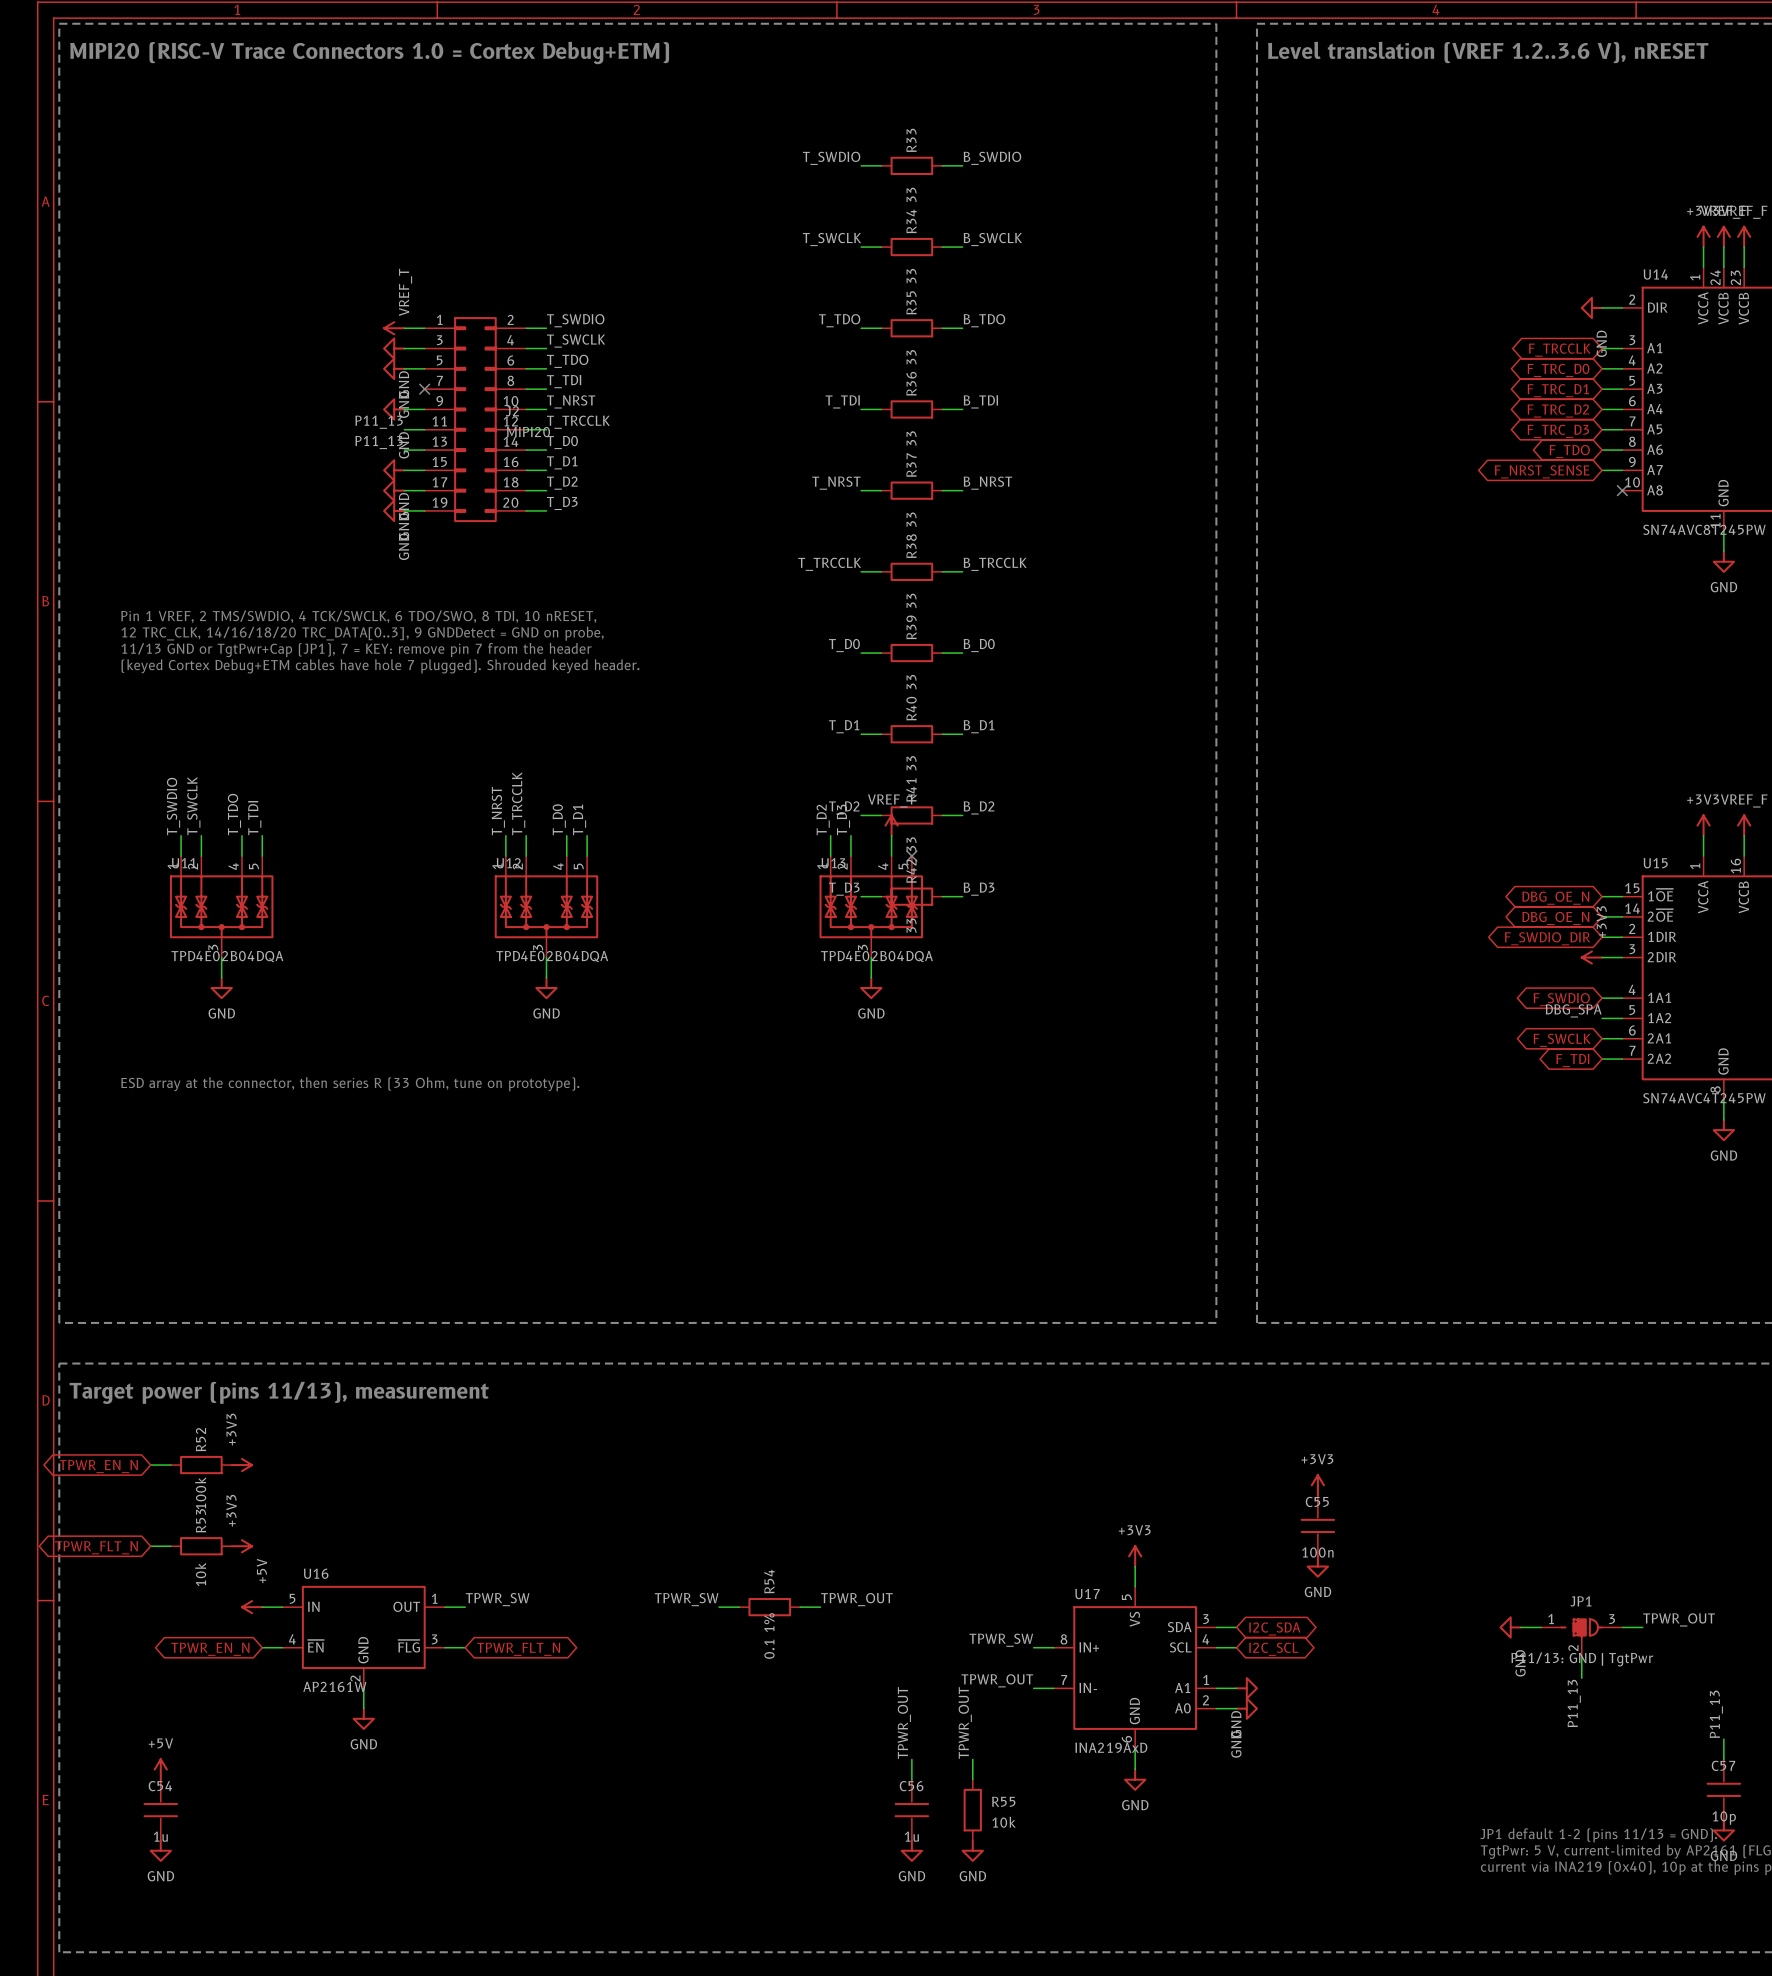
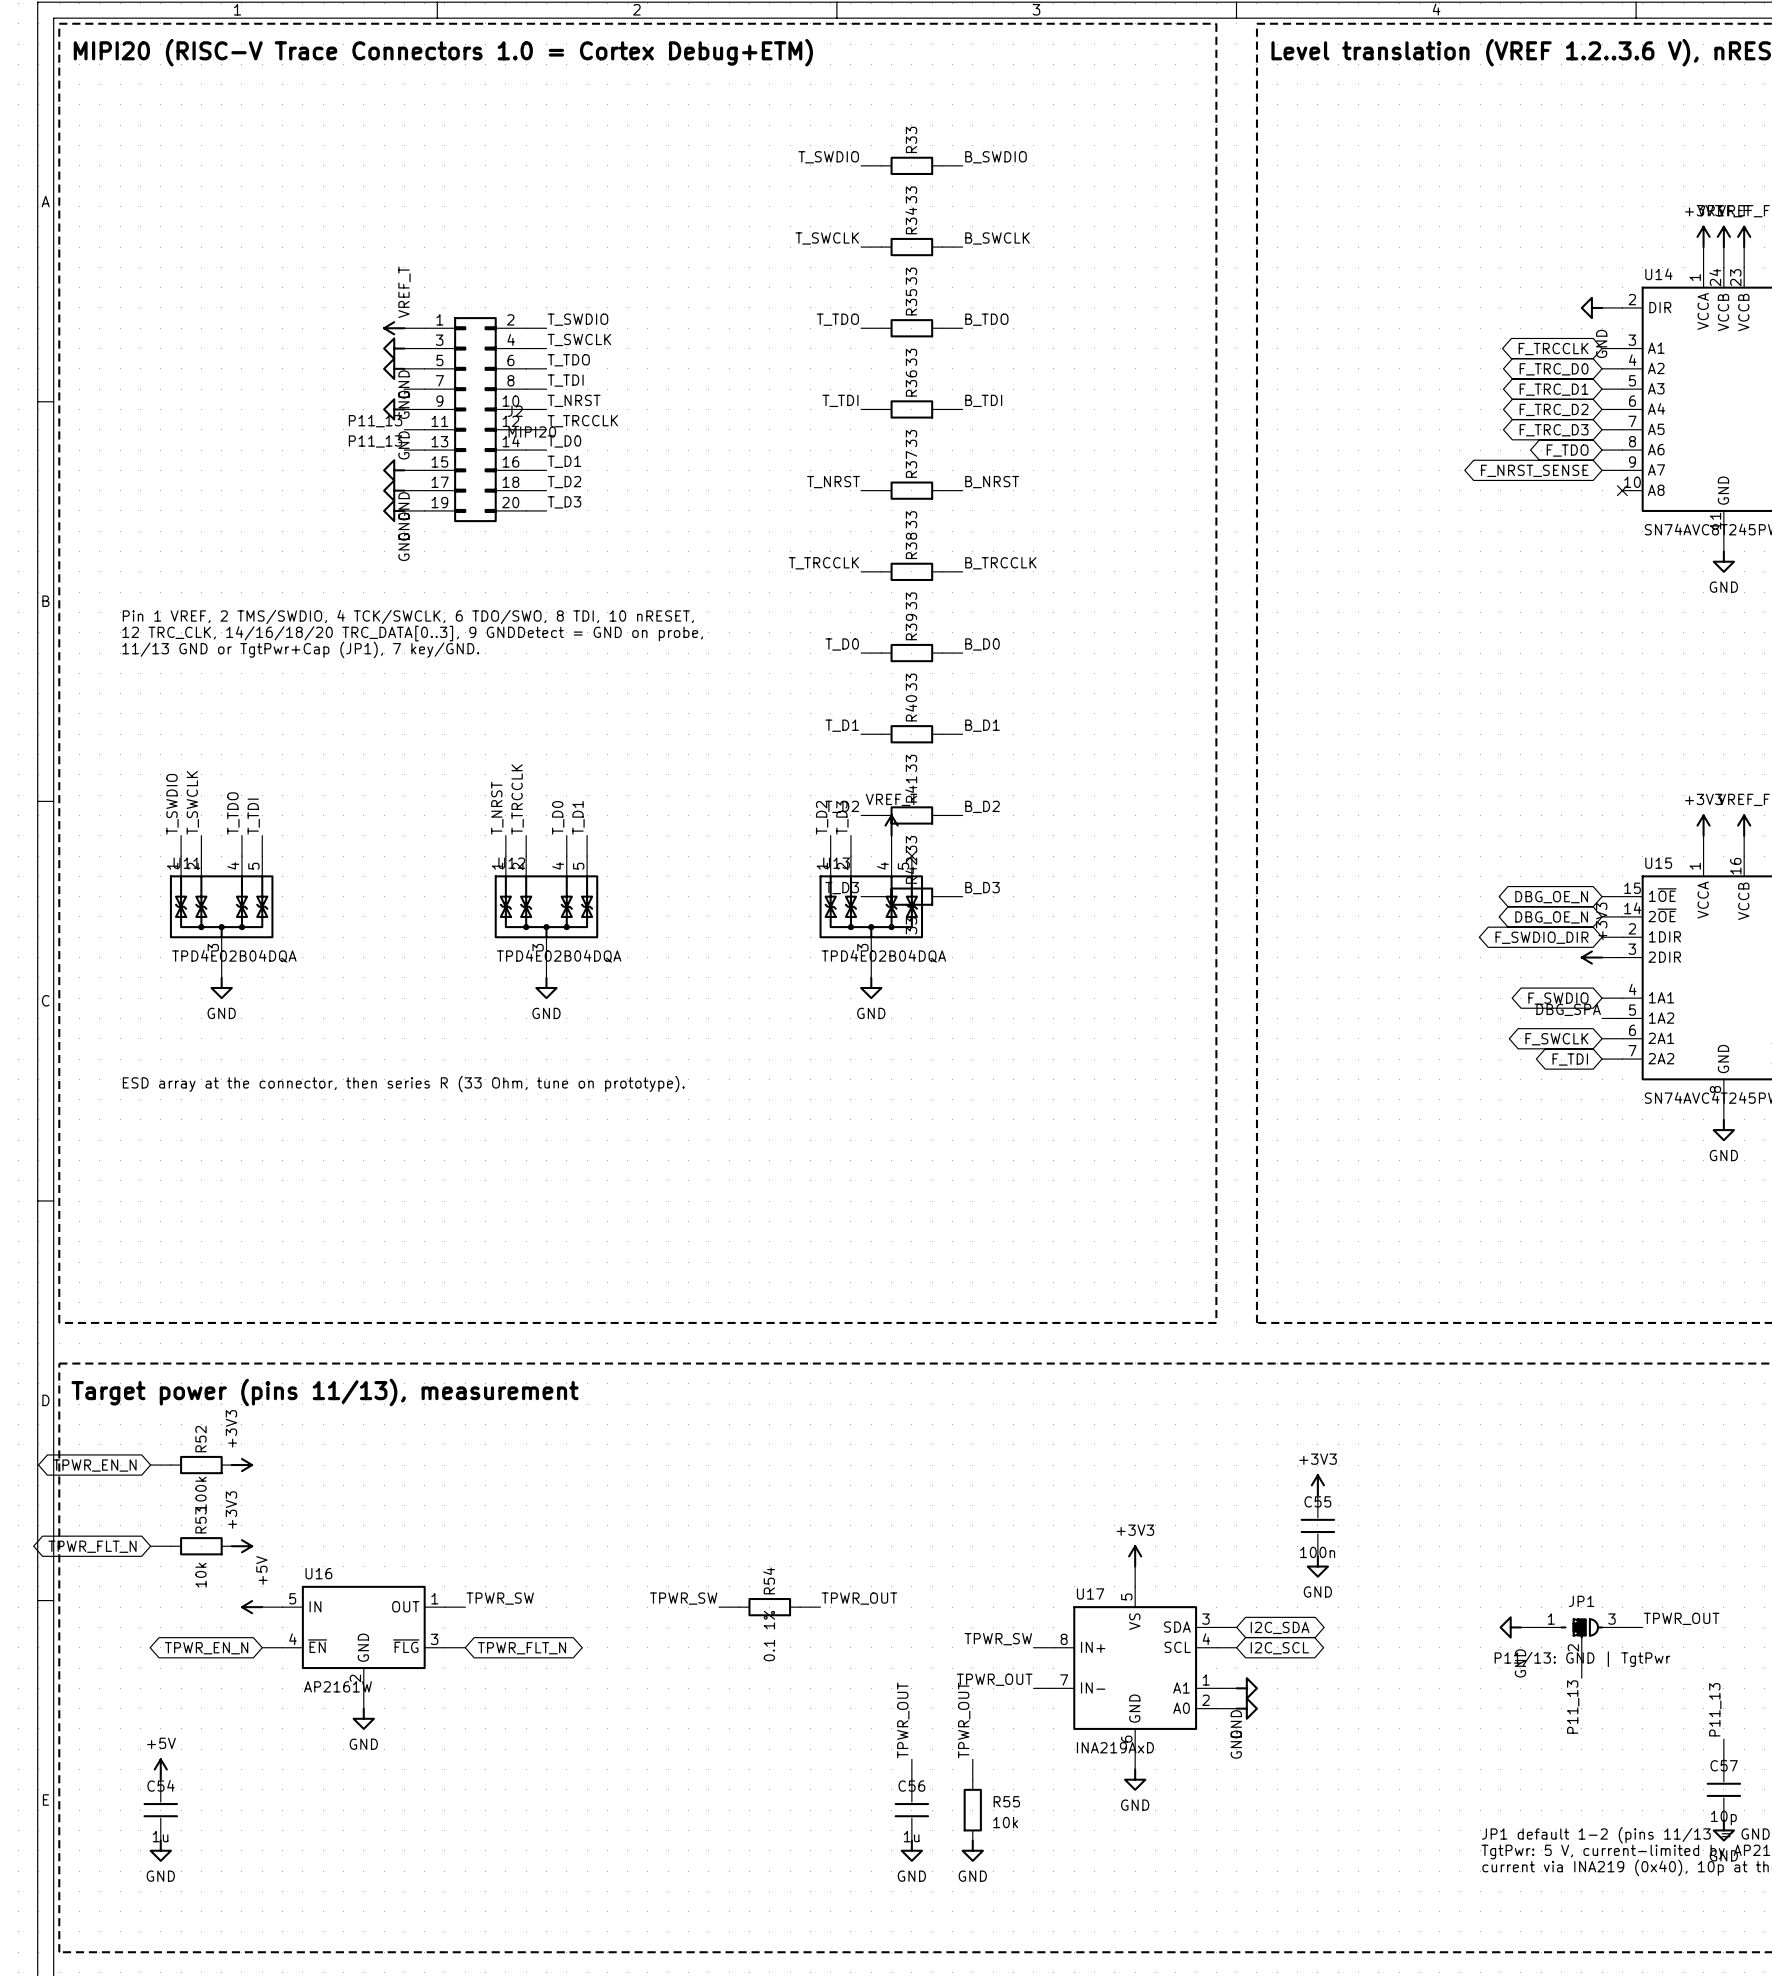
wire: none -> (404, 389) (424, 389)
no-connect mark: (424, 389) -> none
text: 11/13 GND or TgtPwr+Cap (JP1), 7 = KEY: remove pin 7 from the header (356, 650) -> 11/13 GND or TgtPwr+Cap (JP1), 7 key/GND. (300, 649)
text: (keyed Cortex Debug+ETM cables have hole 7 plugged). Shrouded keyed header. (380, 666) -> none

